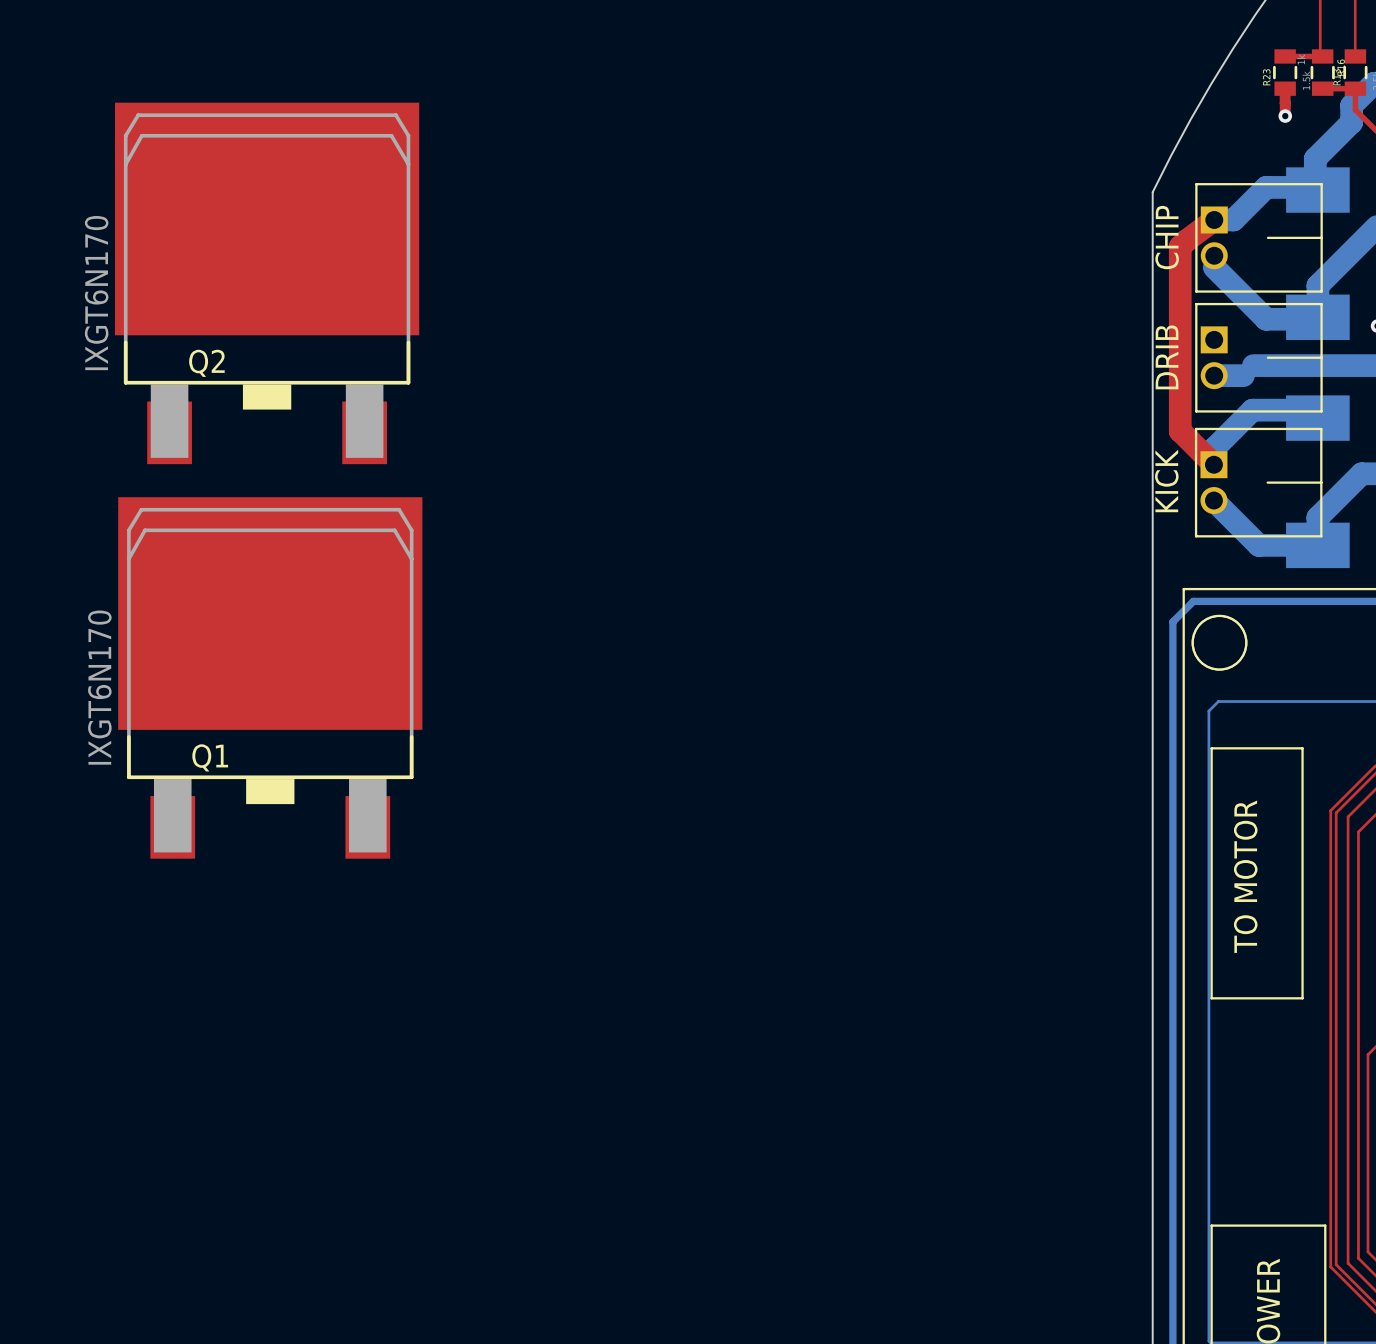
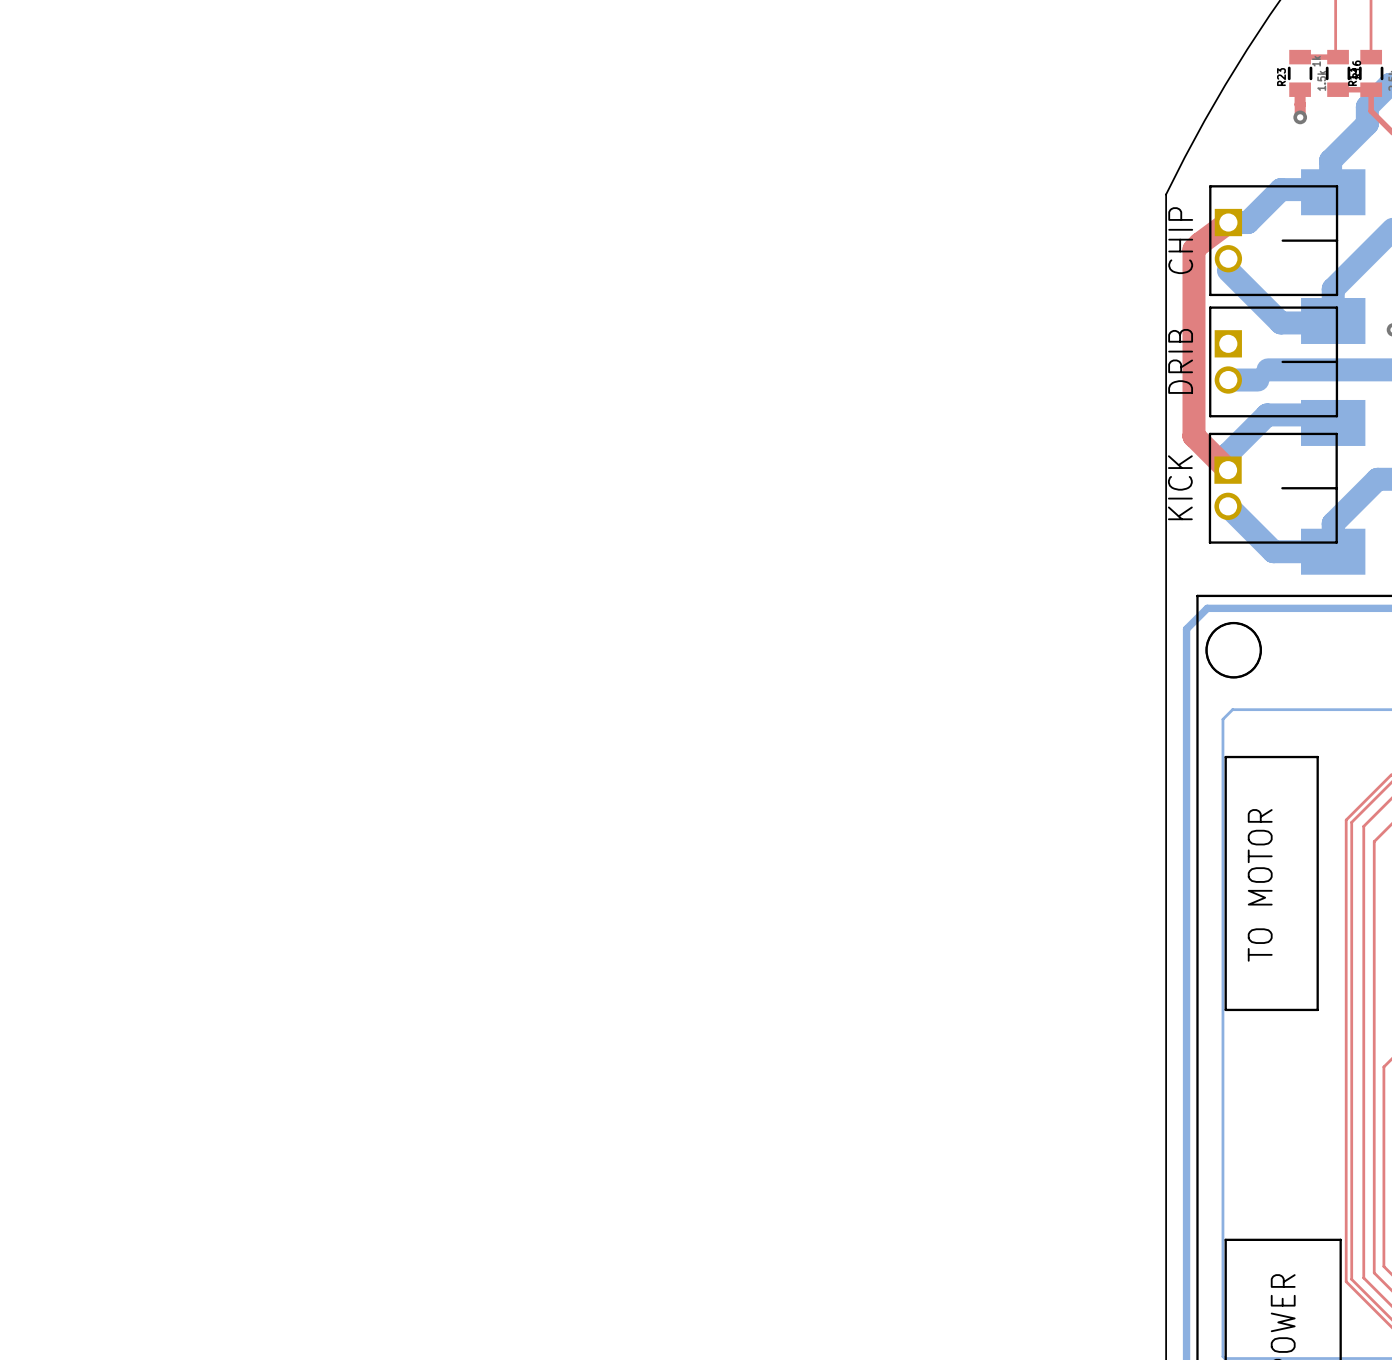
Q2: IXGT6N170 (267, 283) -> none
Q1: IXGT6N170 (270, 677) -> none

